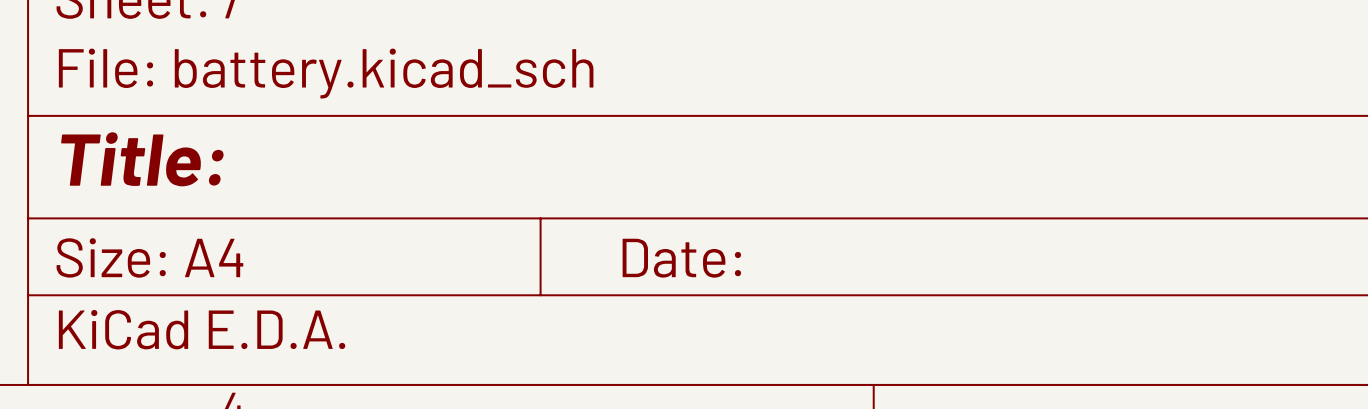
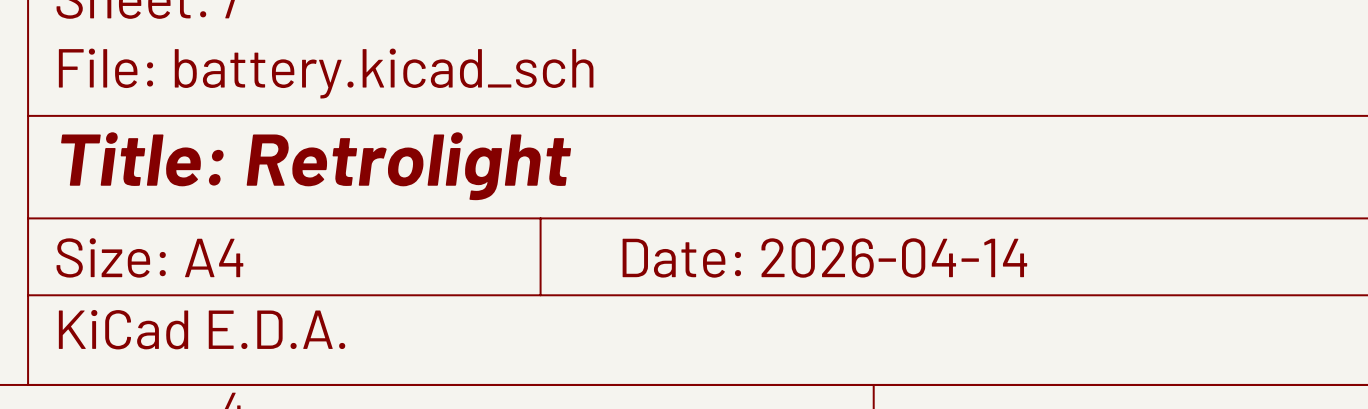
title block: Title: (142, 159) -> Title: Retrolight (316, 166)
title block: Date: (681, 258) -> Date: 2026-04-14 (824, 257)

